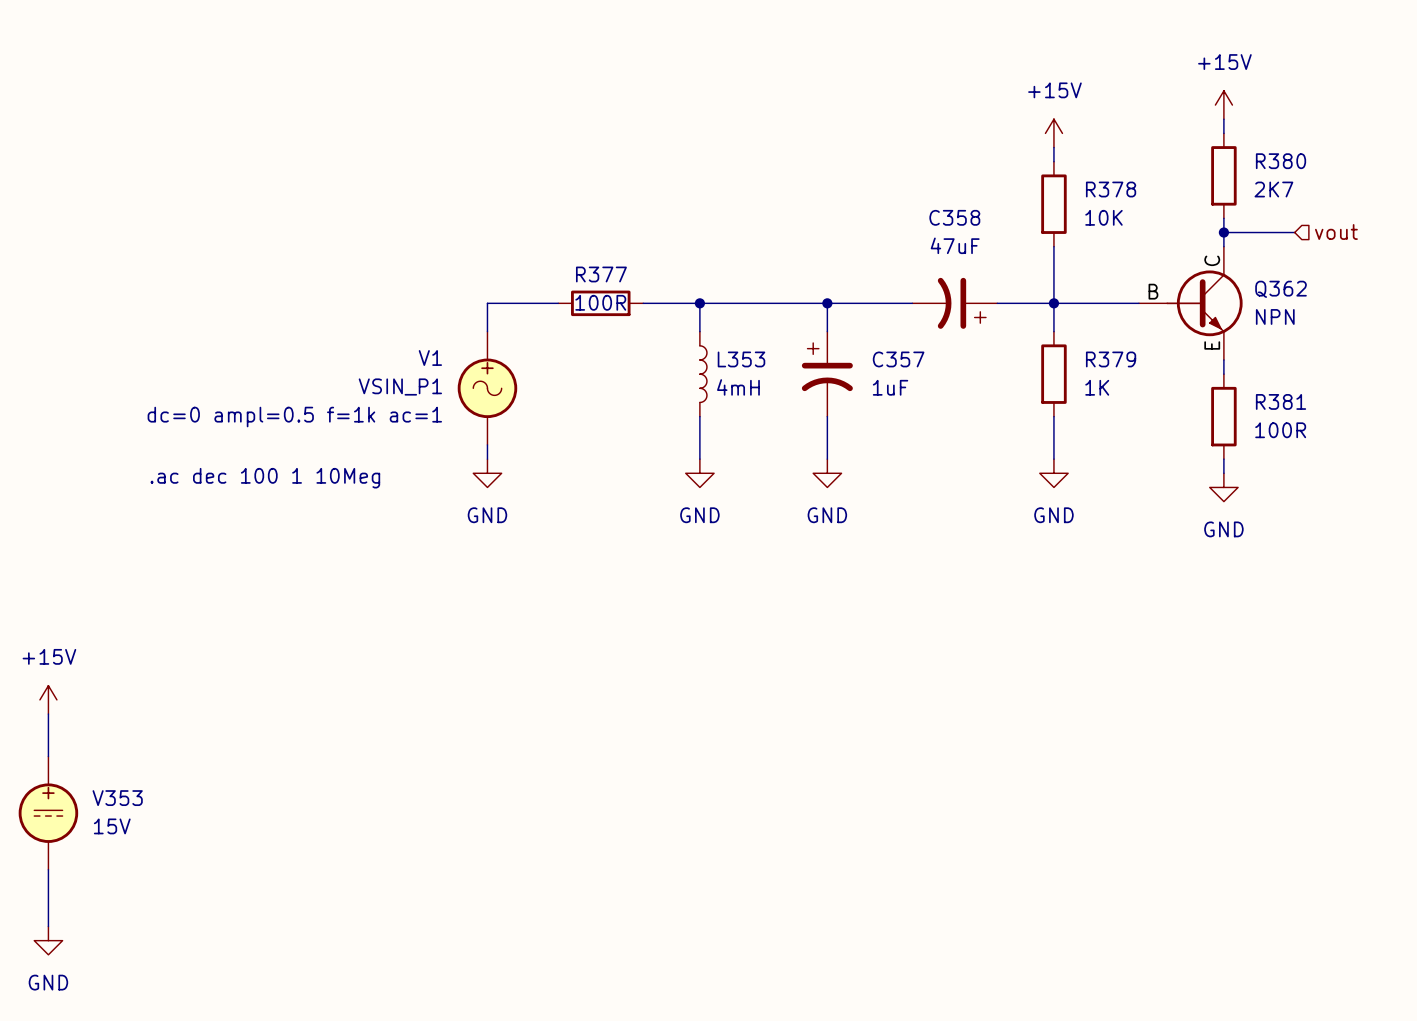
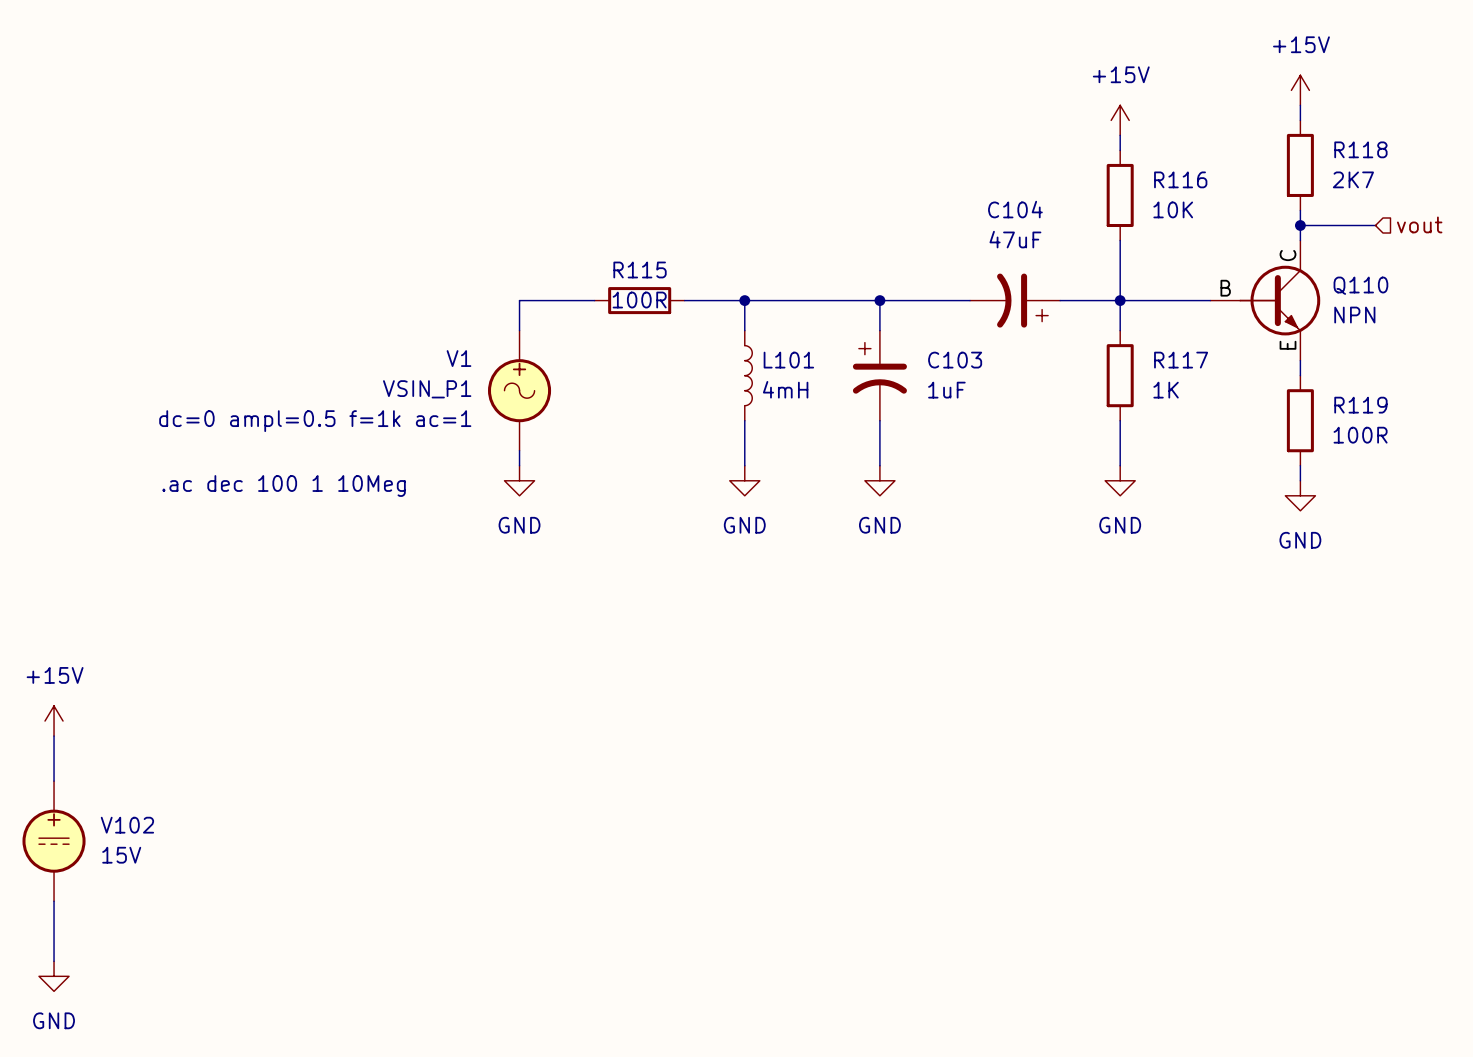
R380 name: R380 (1281, 161) -> R118 (1360, 149)
R378 name: R378 (1111, 189) -> R116 (1180, 179)
C358 name: C358 (954, 217) -> C104 (1015, 209)
R377 name: R377 (601, 274) -> R115 (640, 269)
Q362 name: Q362 (1281, 289) -> Q110 (1360, 285)
L353 name: L353 (741, 359) -> L101 (788, 360)
C357 name: C357 (898, 359) -> C103 (955, 360)
R379 name: R379 (1111, 359) -> R117 (1181, 360)
R381 name: R381 (1281, 401) -> R119 (1360, 405)
V353 name: V353 (117, 798) -> V102 (127, 825)

